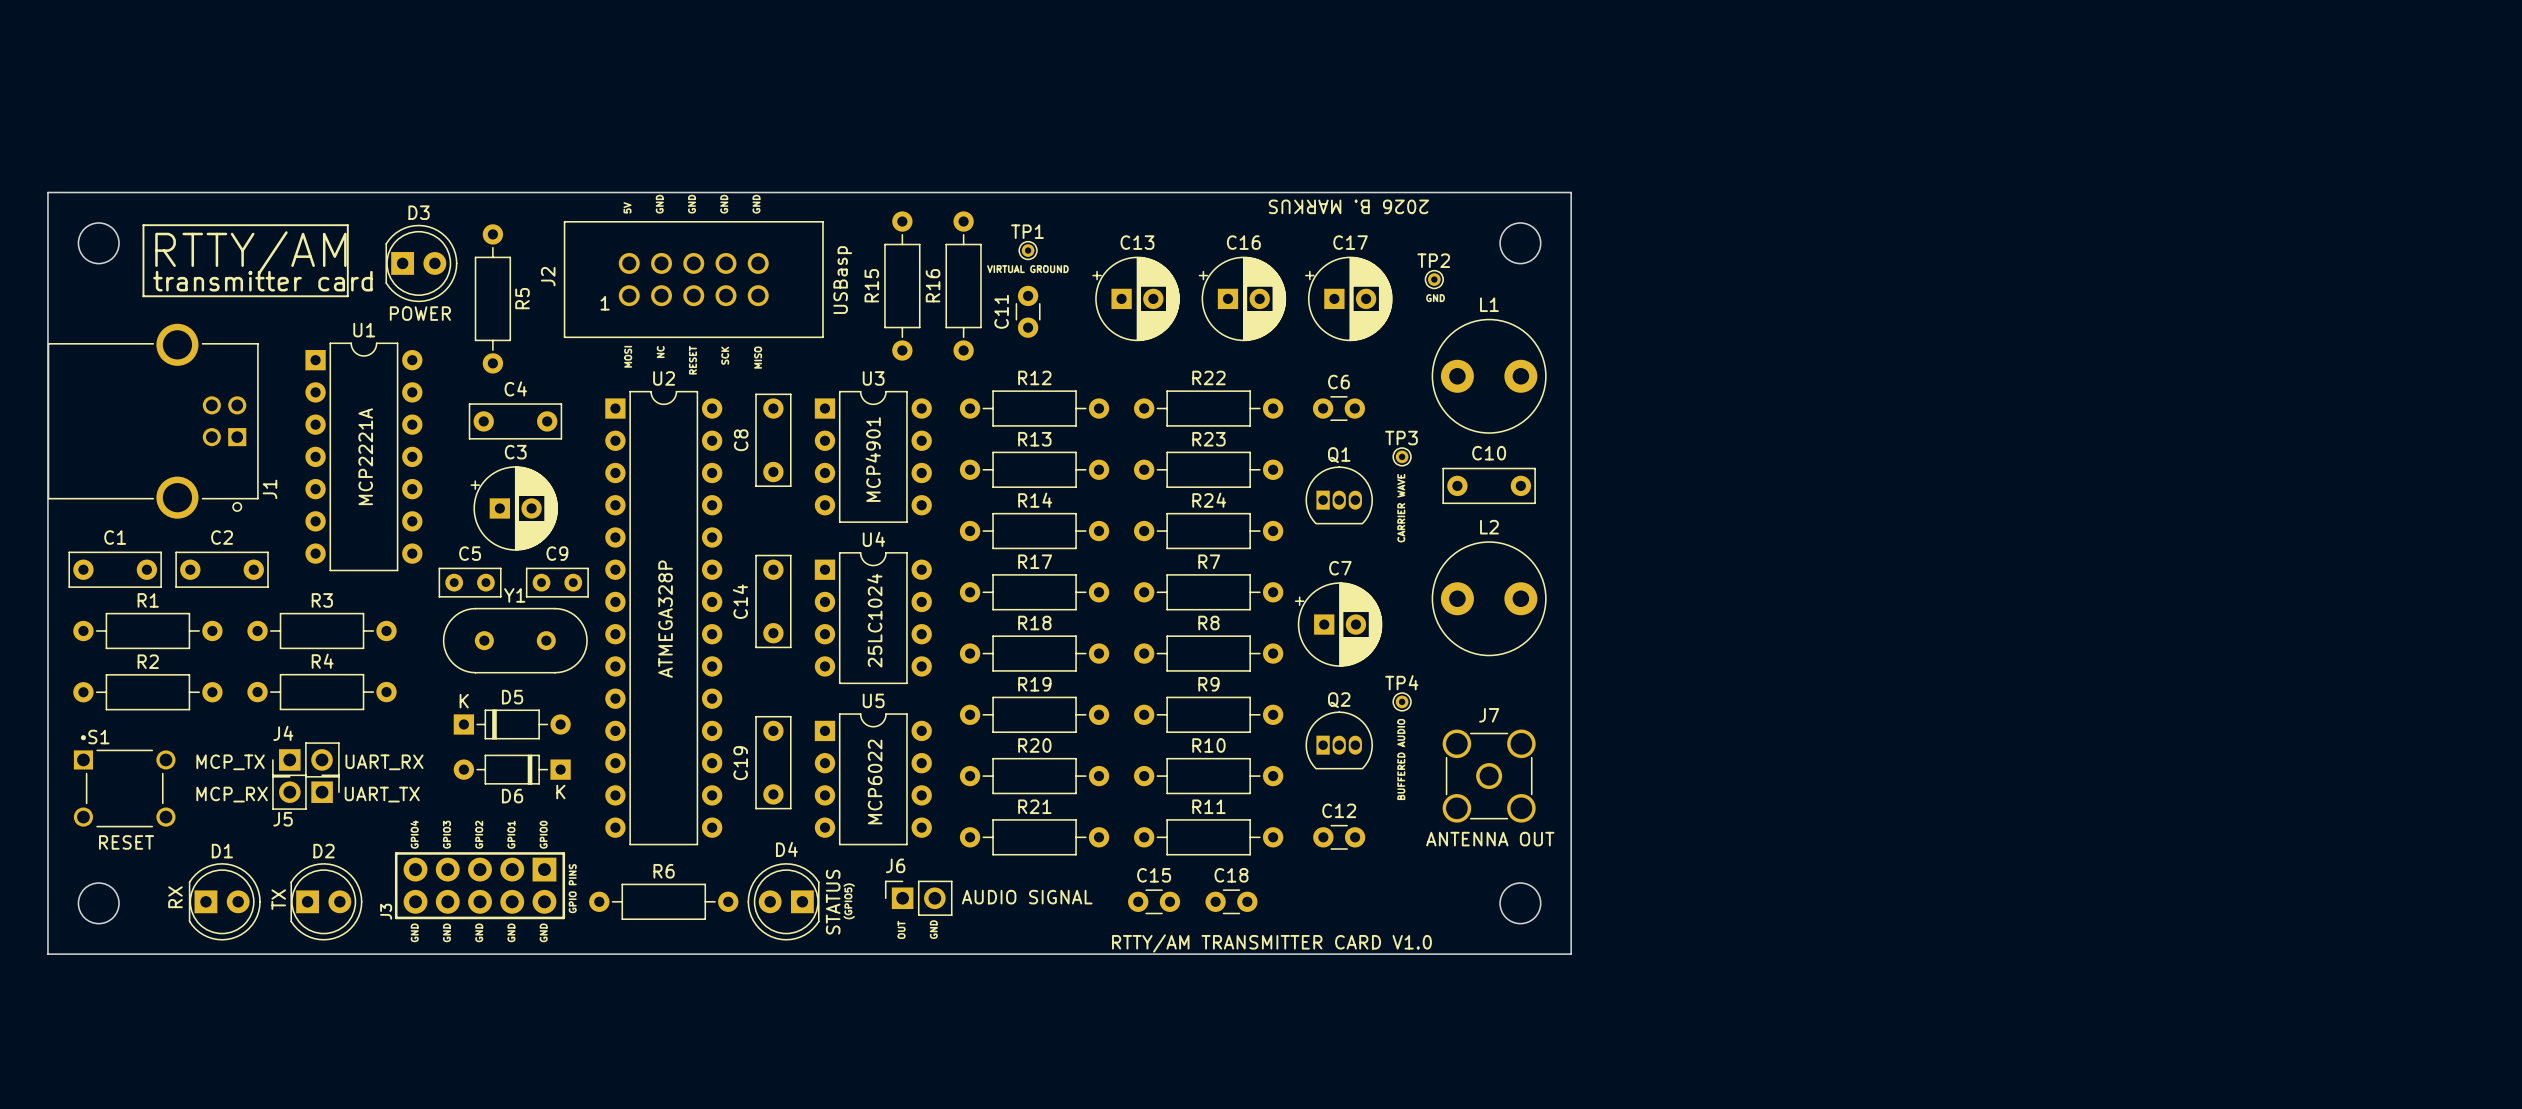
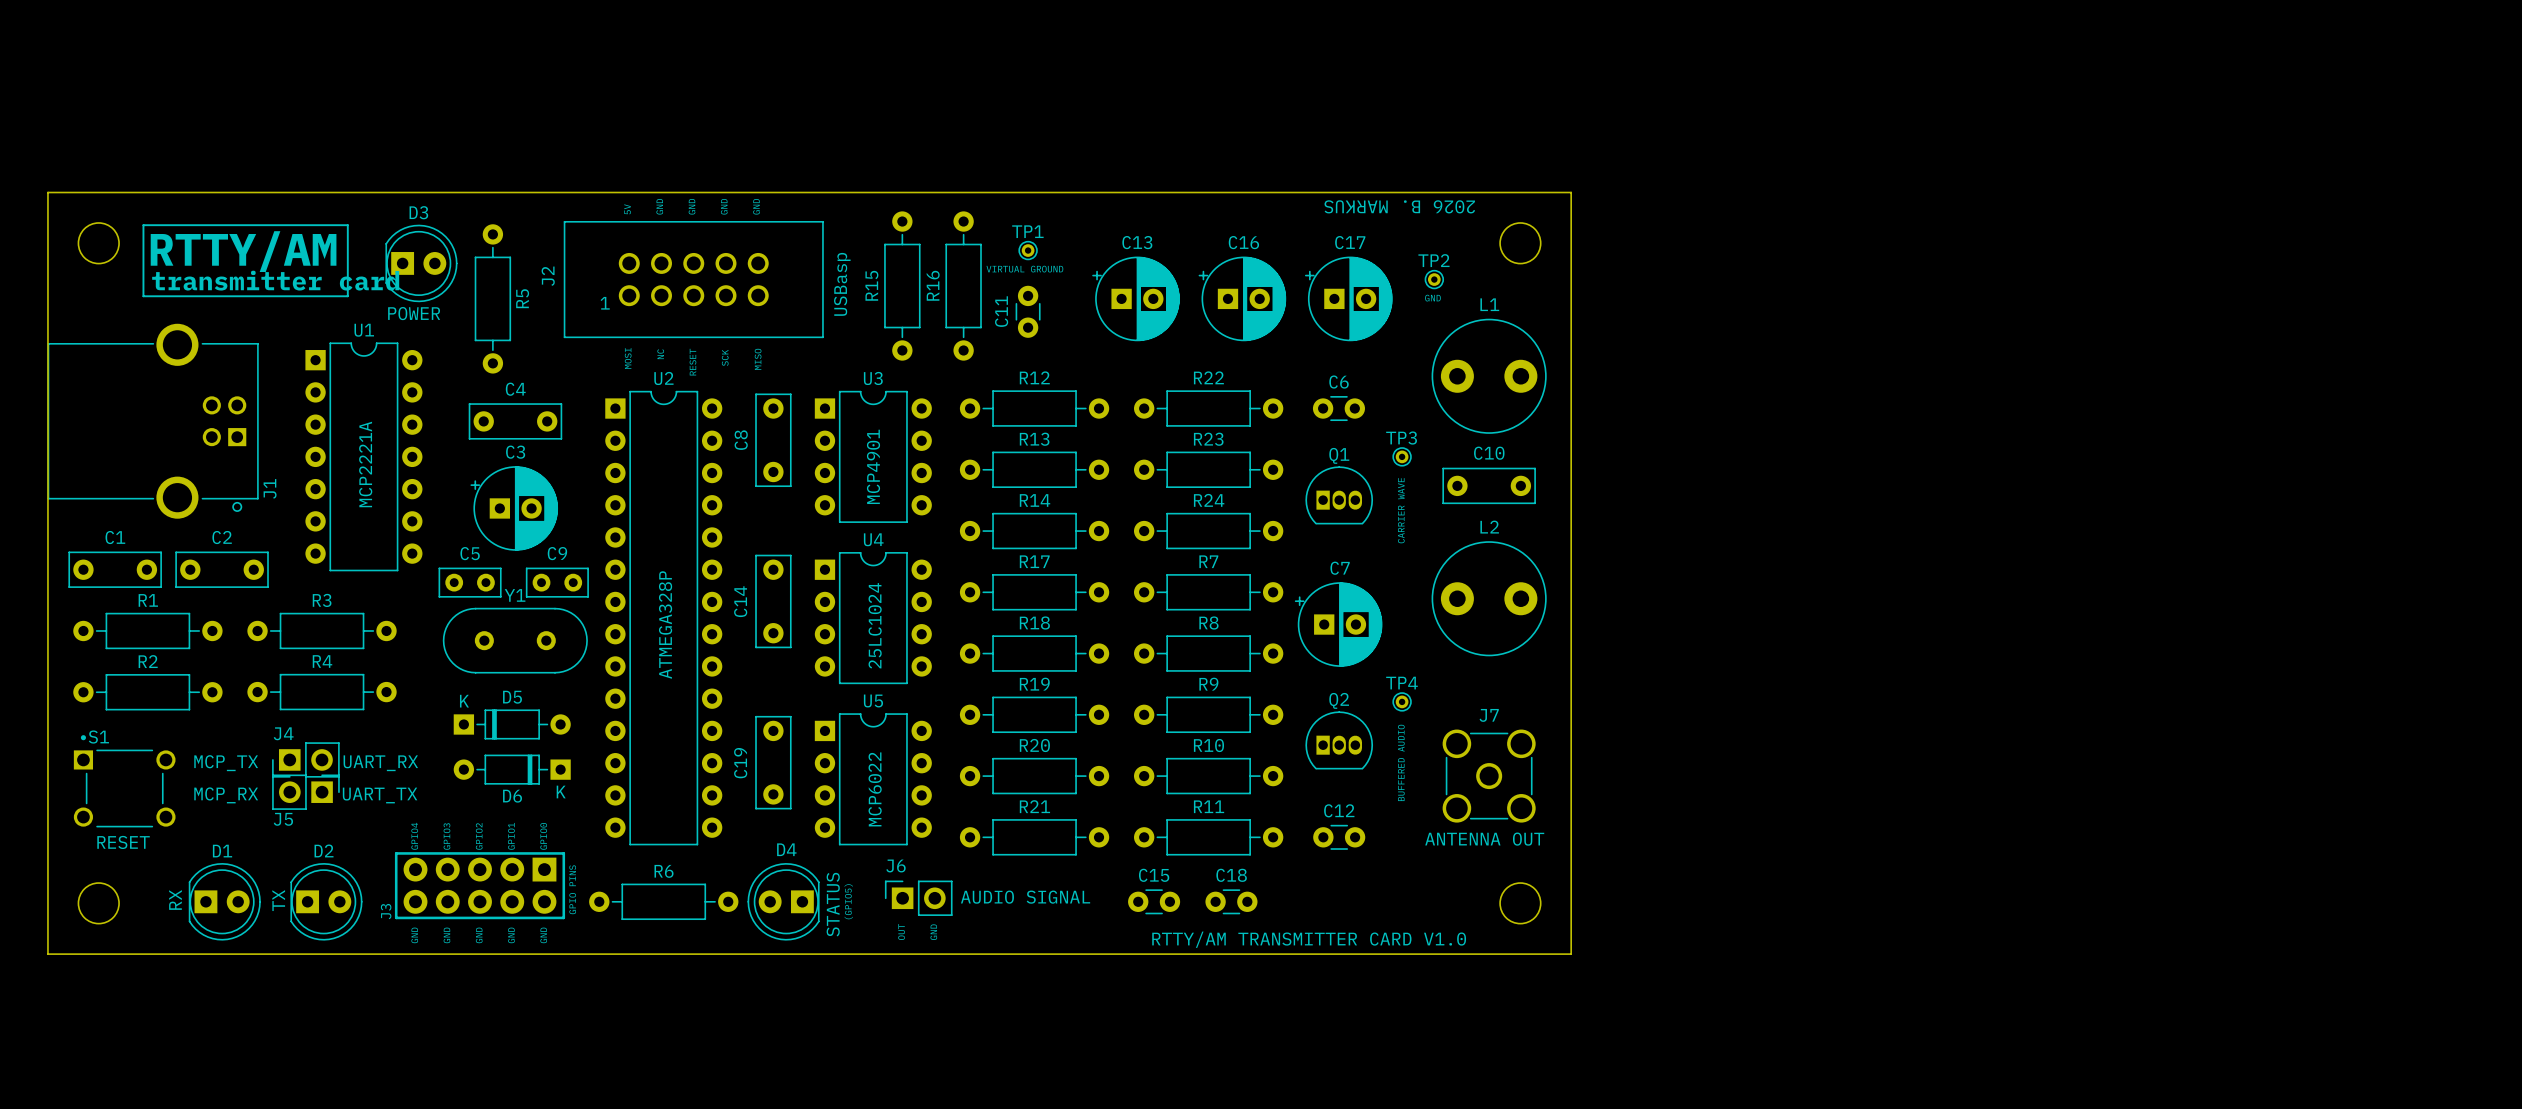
text position: 2026 B. MARKUS (1348, 206) -> 2026 B. MARKUS (1399, 206)
text position: RTTY/AM TRANSMITTER CARD V1.0 (1271, 943) -> RTTY/AM TRANSMITTER CARD V1.0 (1309, 939)

